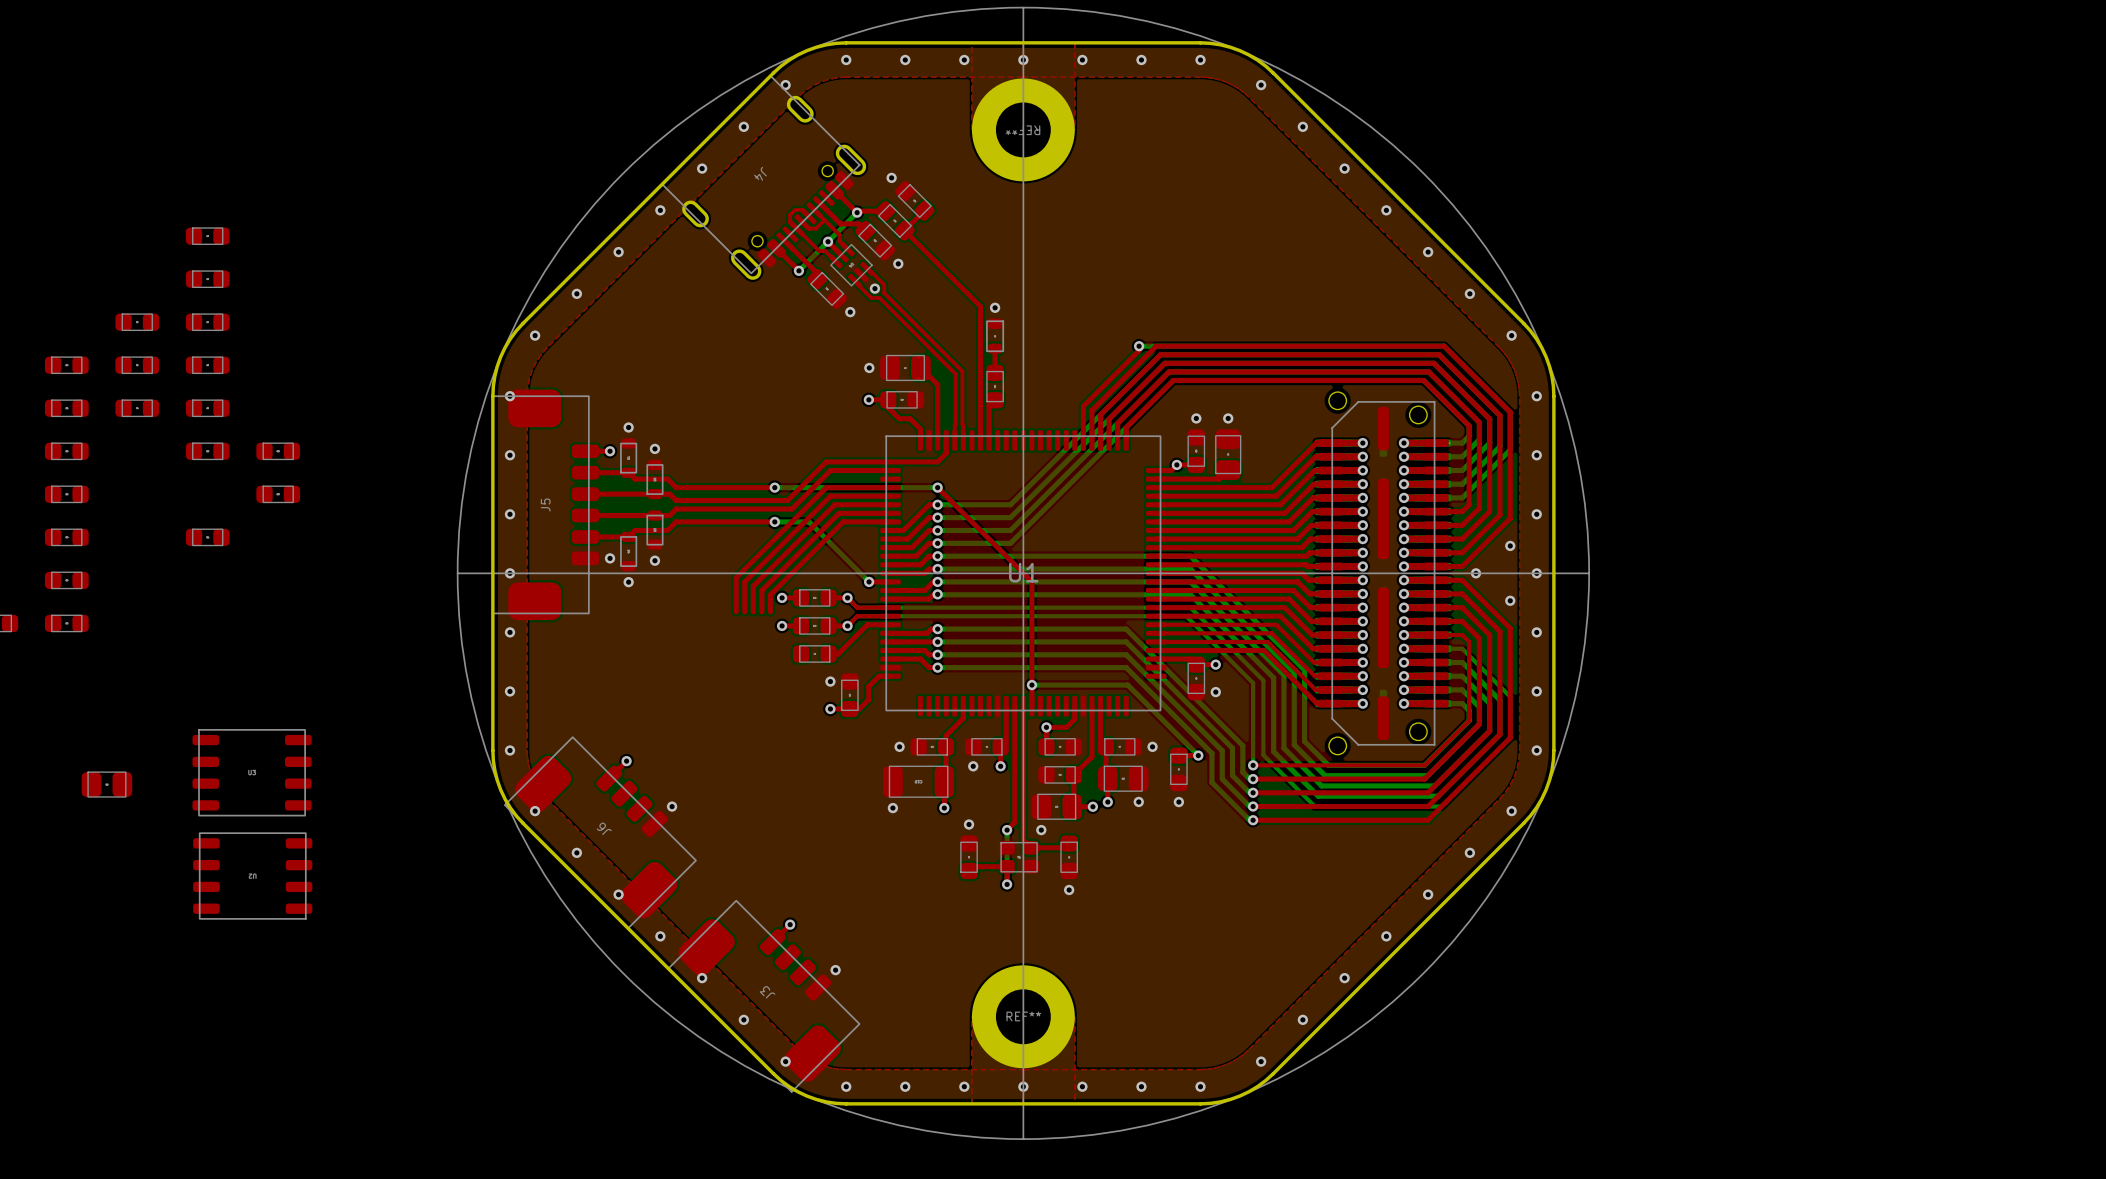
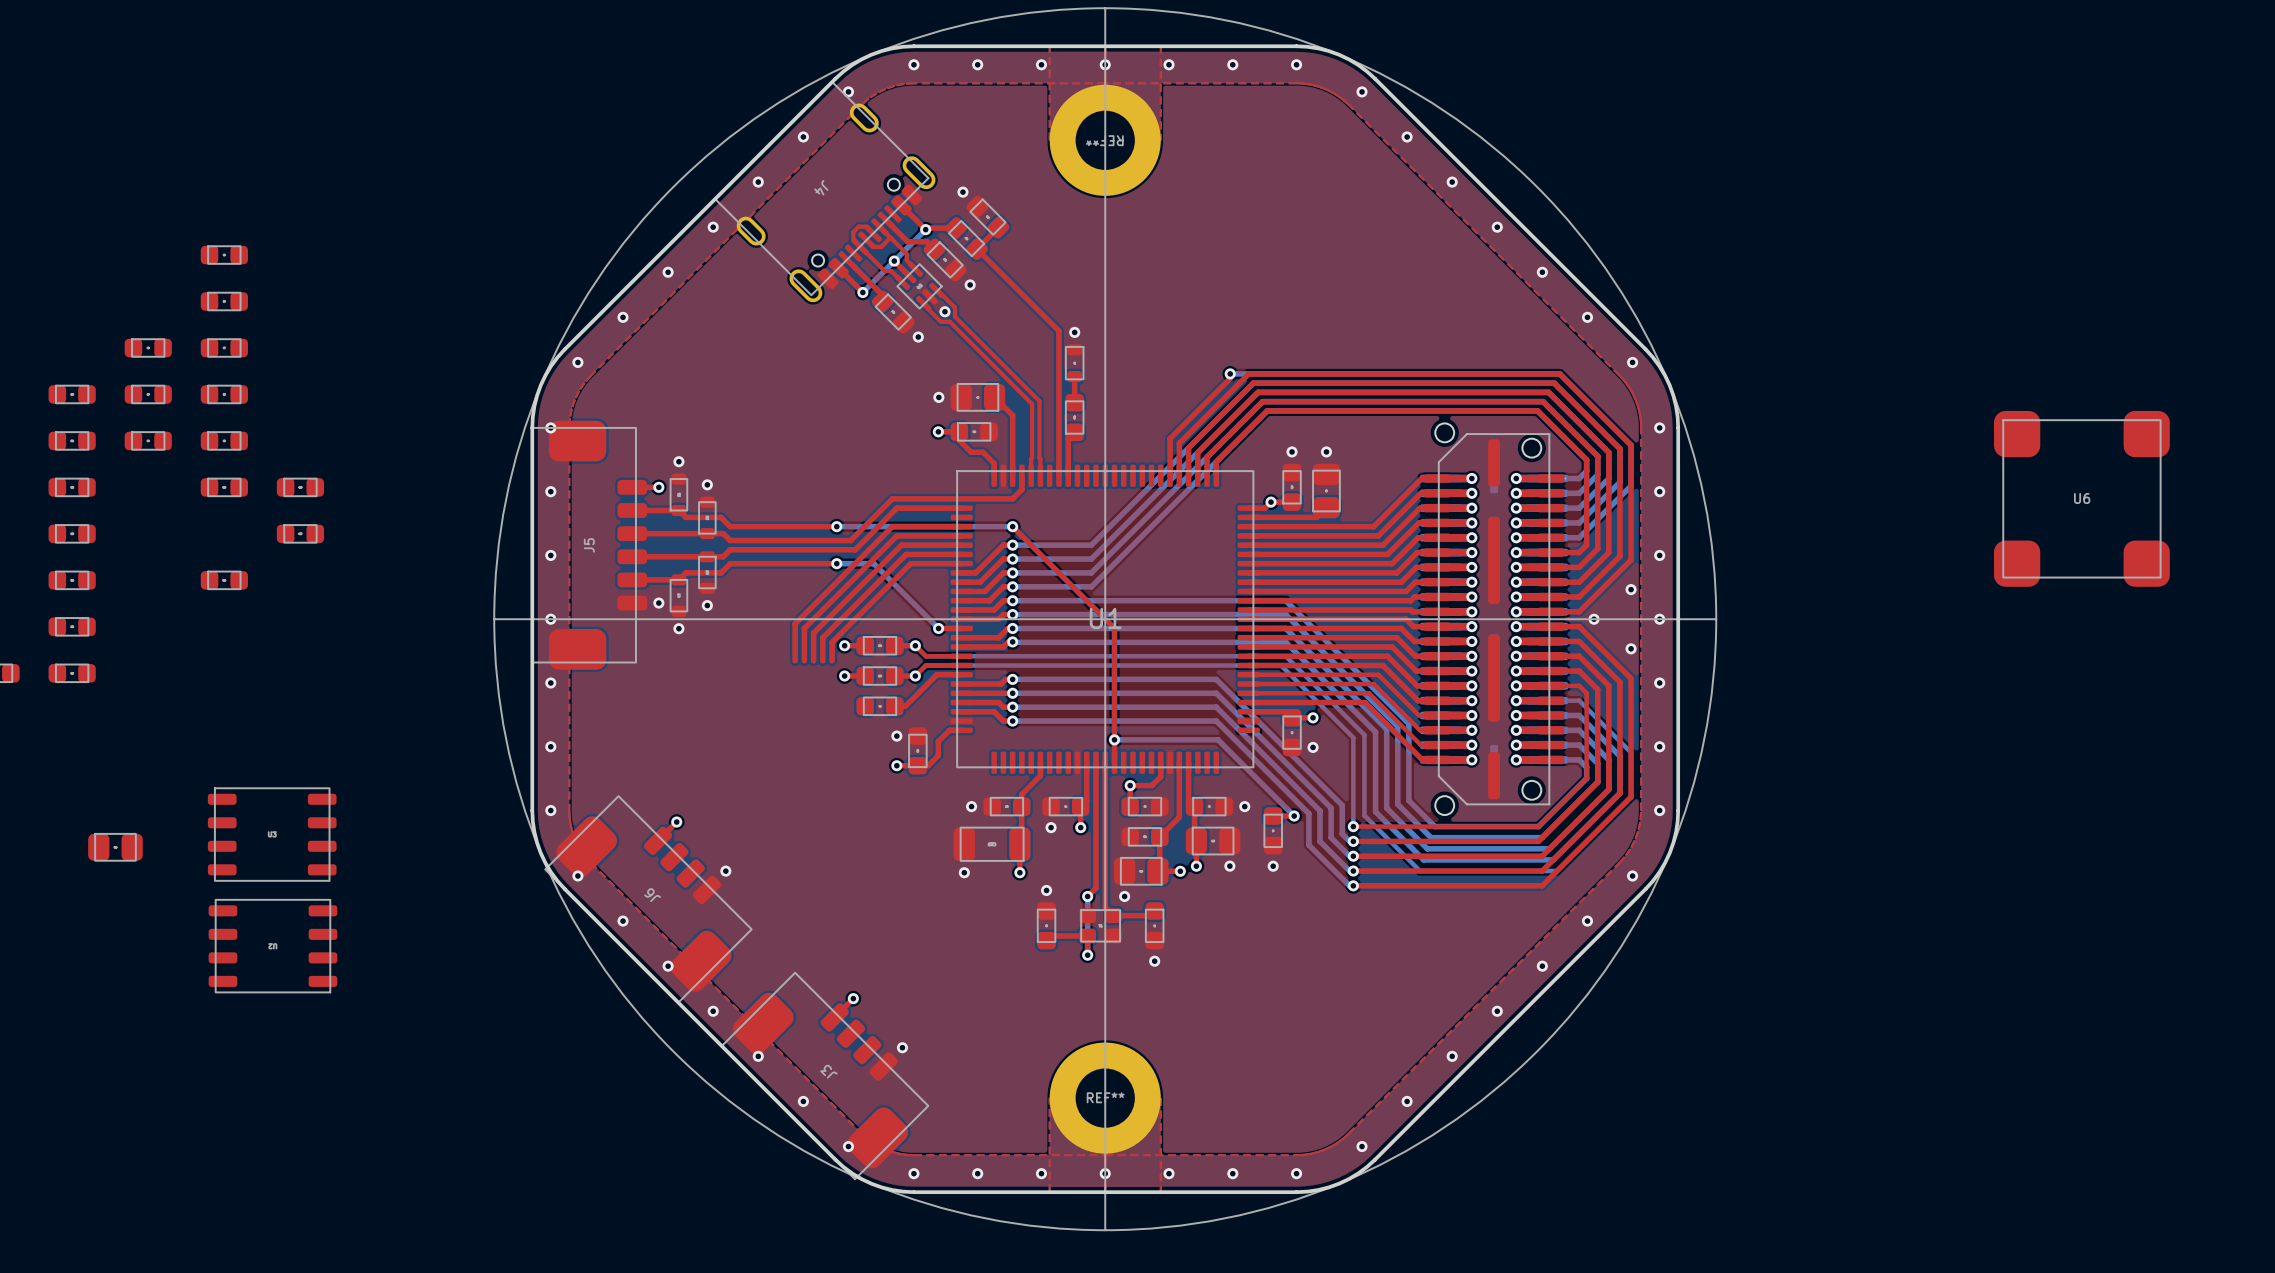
U6: none -> (2081, 498)

